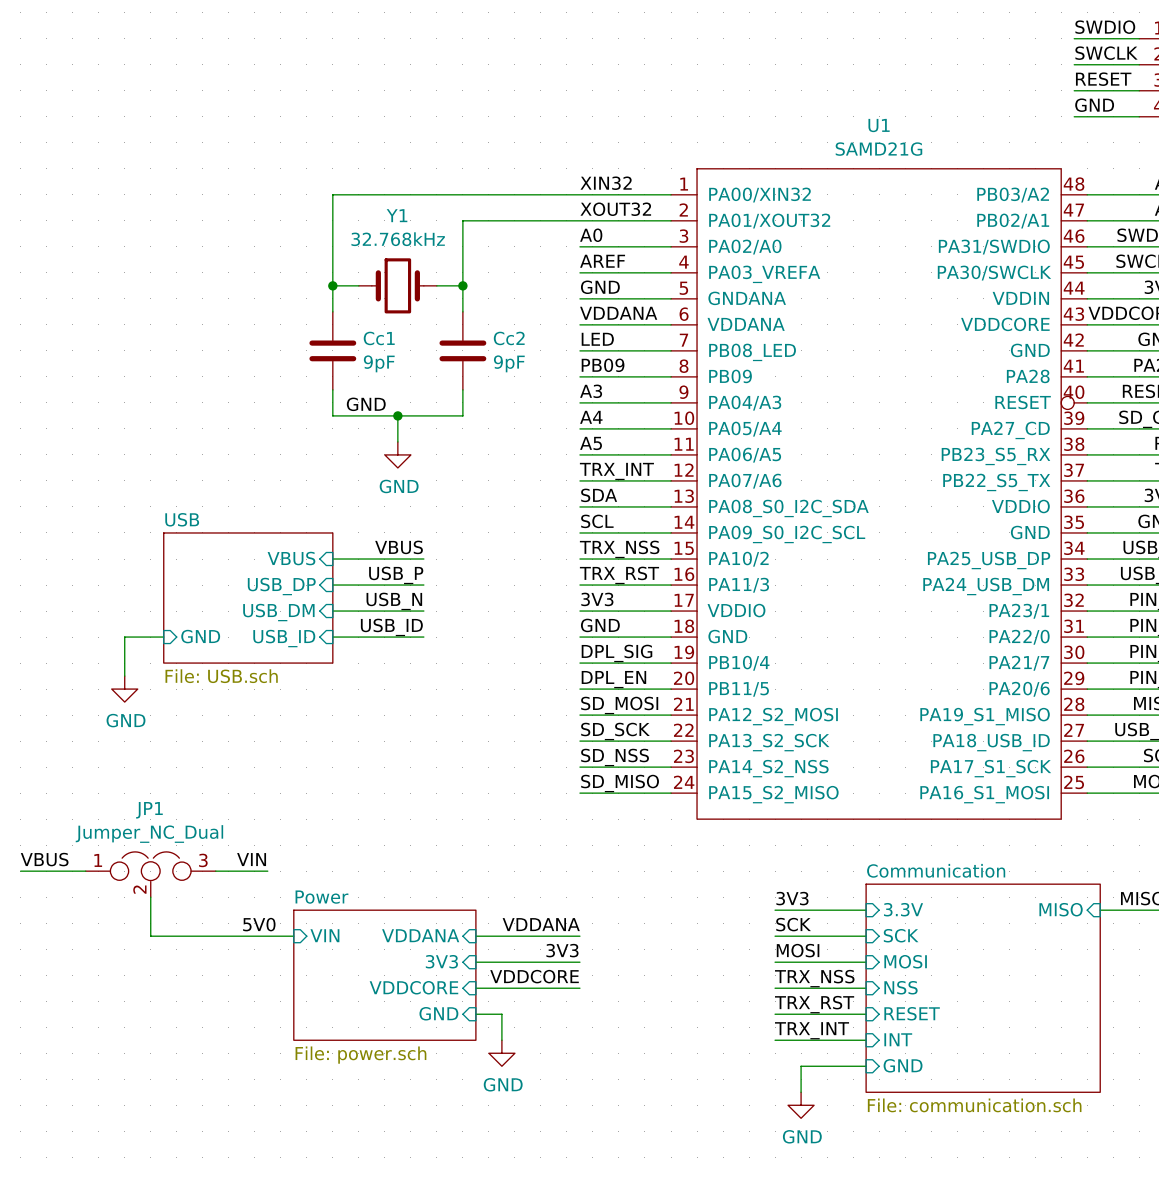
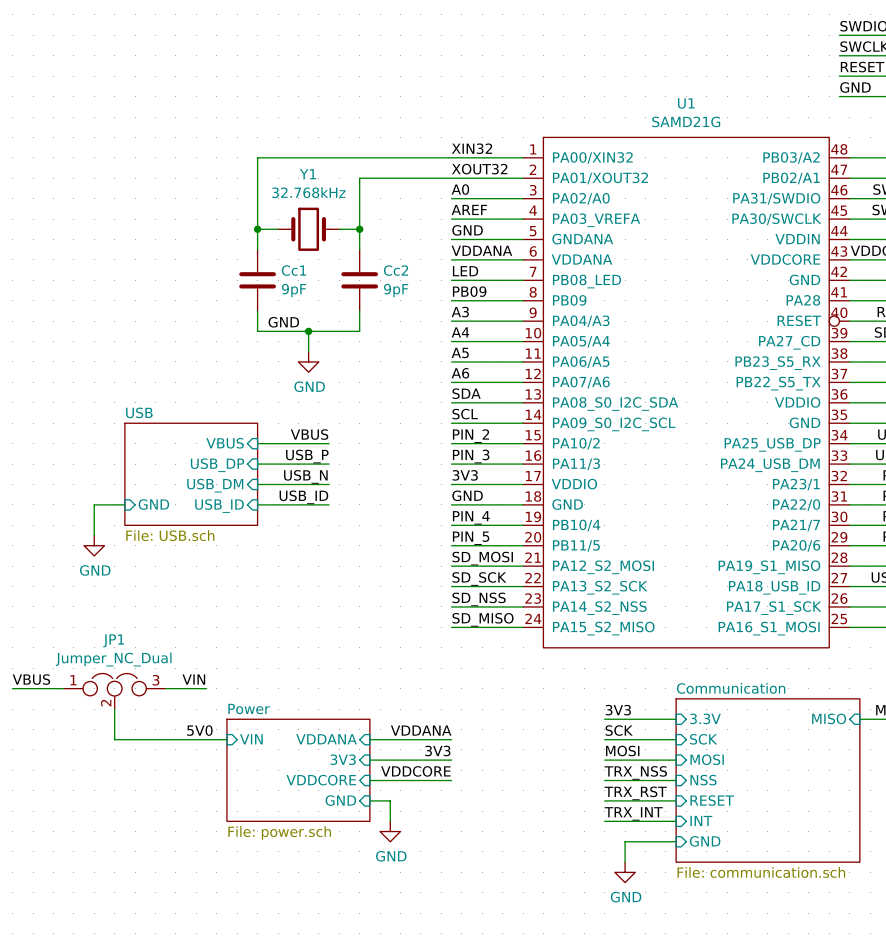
label: TRX_INT (616, 471) -> A6 (460, 373)
label: TRX_NSS (619, 549) -> PIN_2 (471, 436)
label: TRX_RST (619, 575) -> PIN_3 (471, 456)
label: DPL_SIG (616, 653) -> PIN_4 (471, 517)
label: DPL_EN (613, 679) -> PIN_5 (471, 538)

